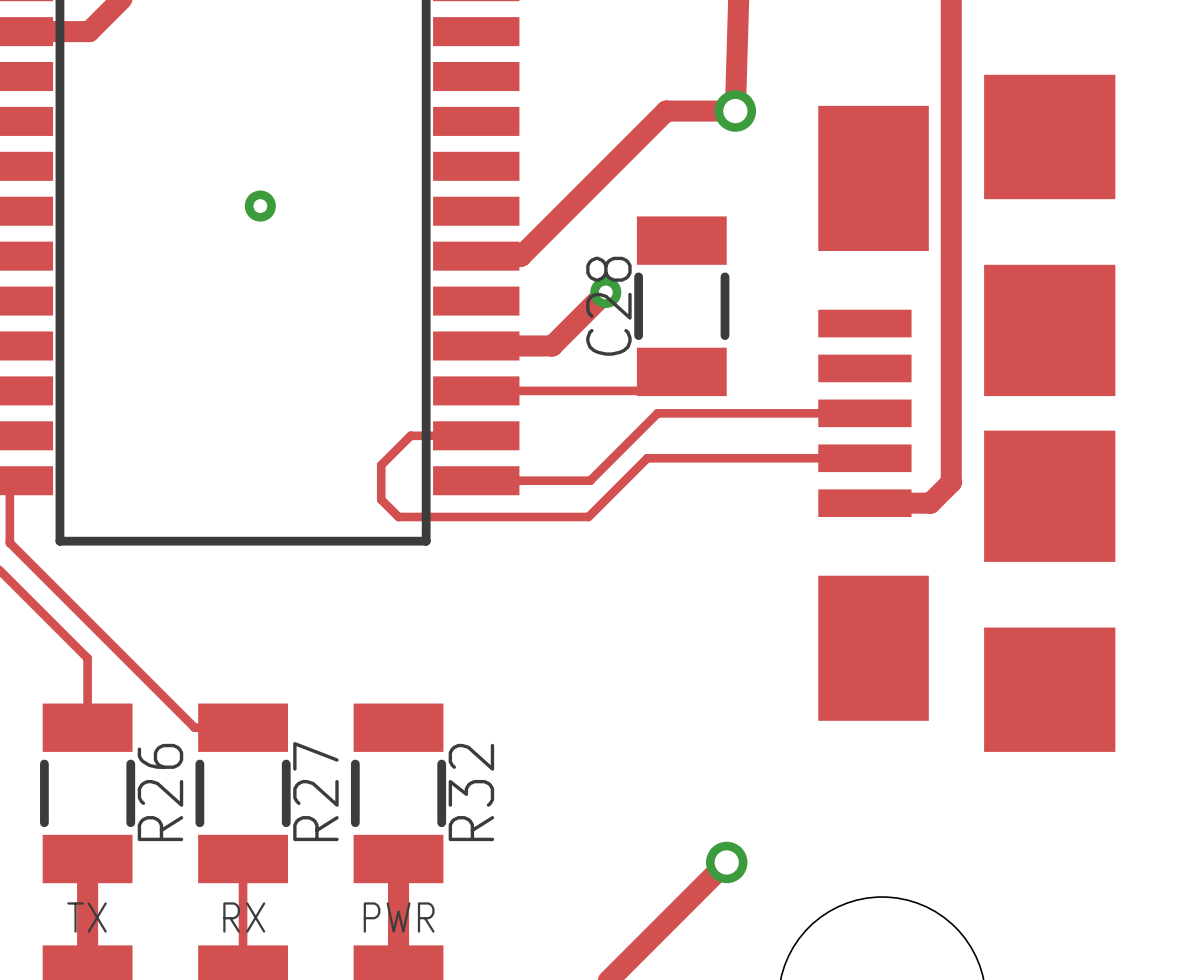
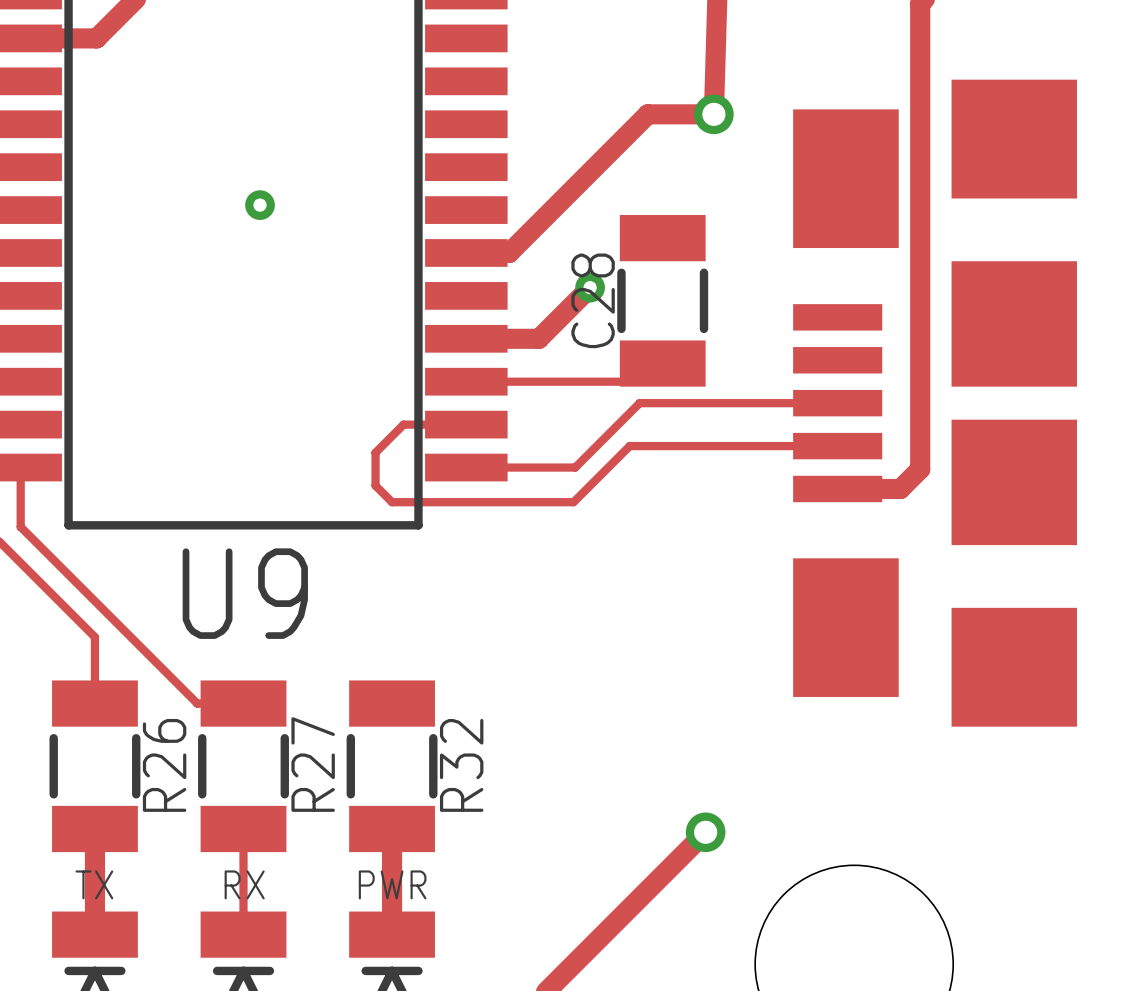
U9 name: none -> U9 (245, 593)

